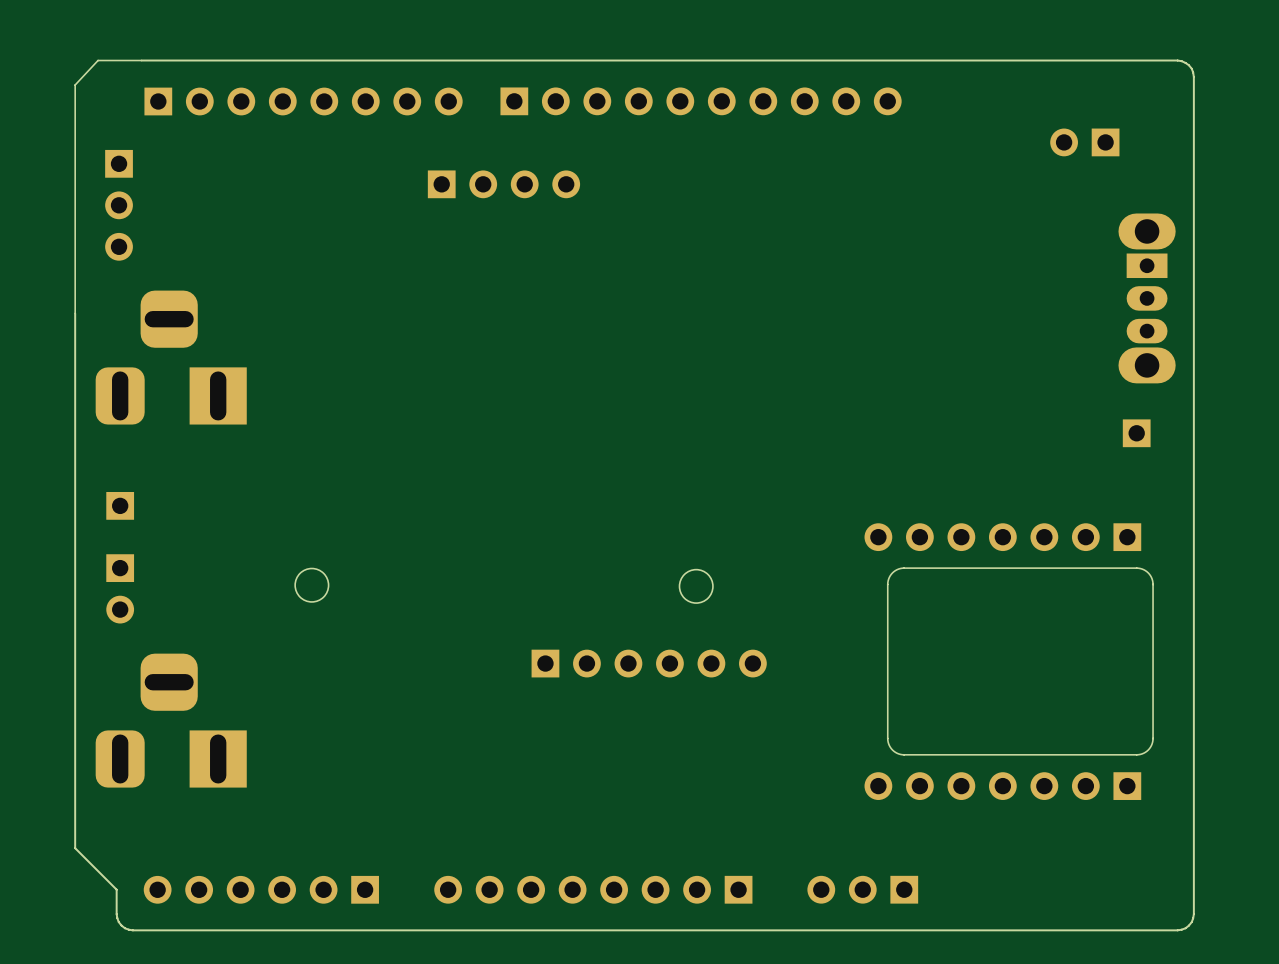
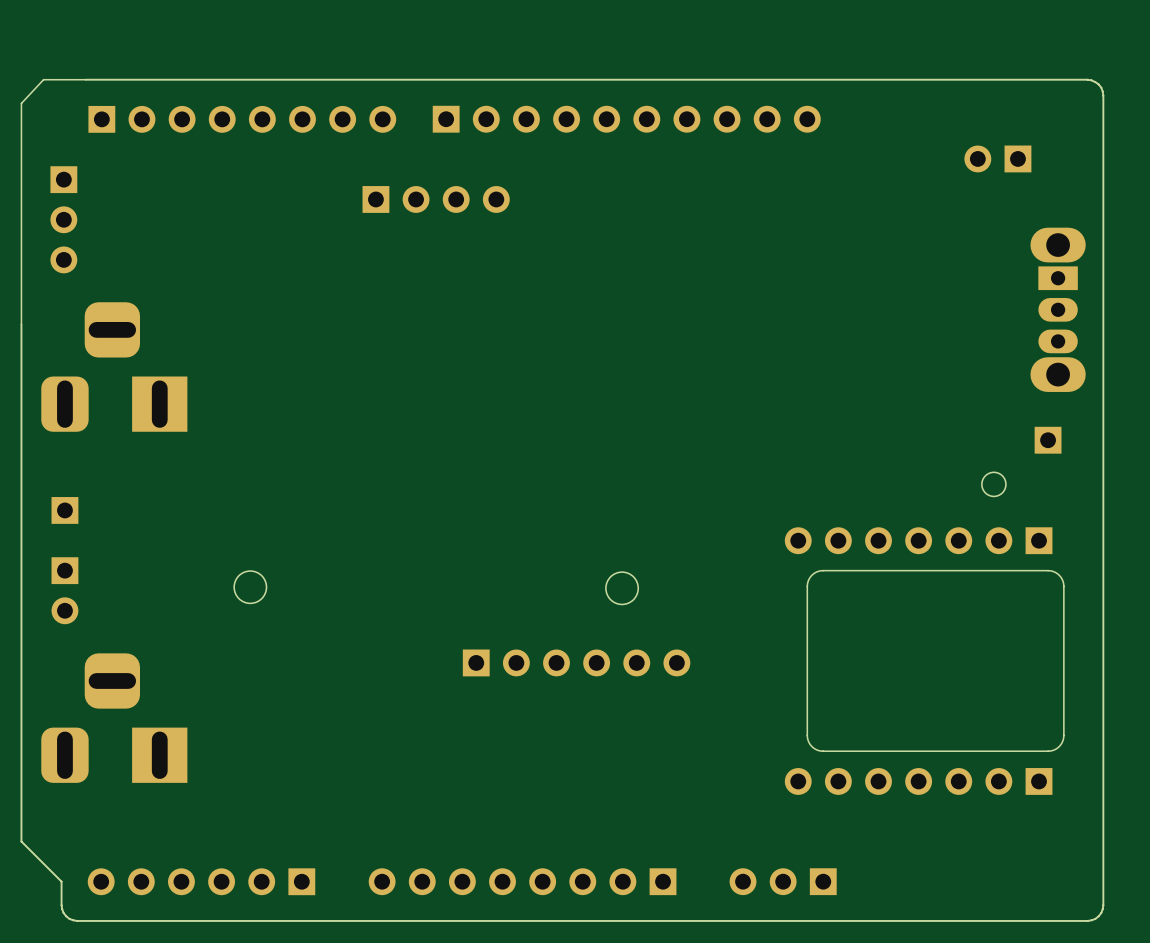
round board edge: none -> [981, 471, 1007, 498]

